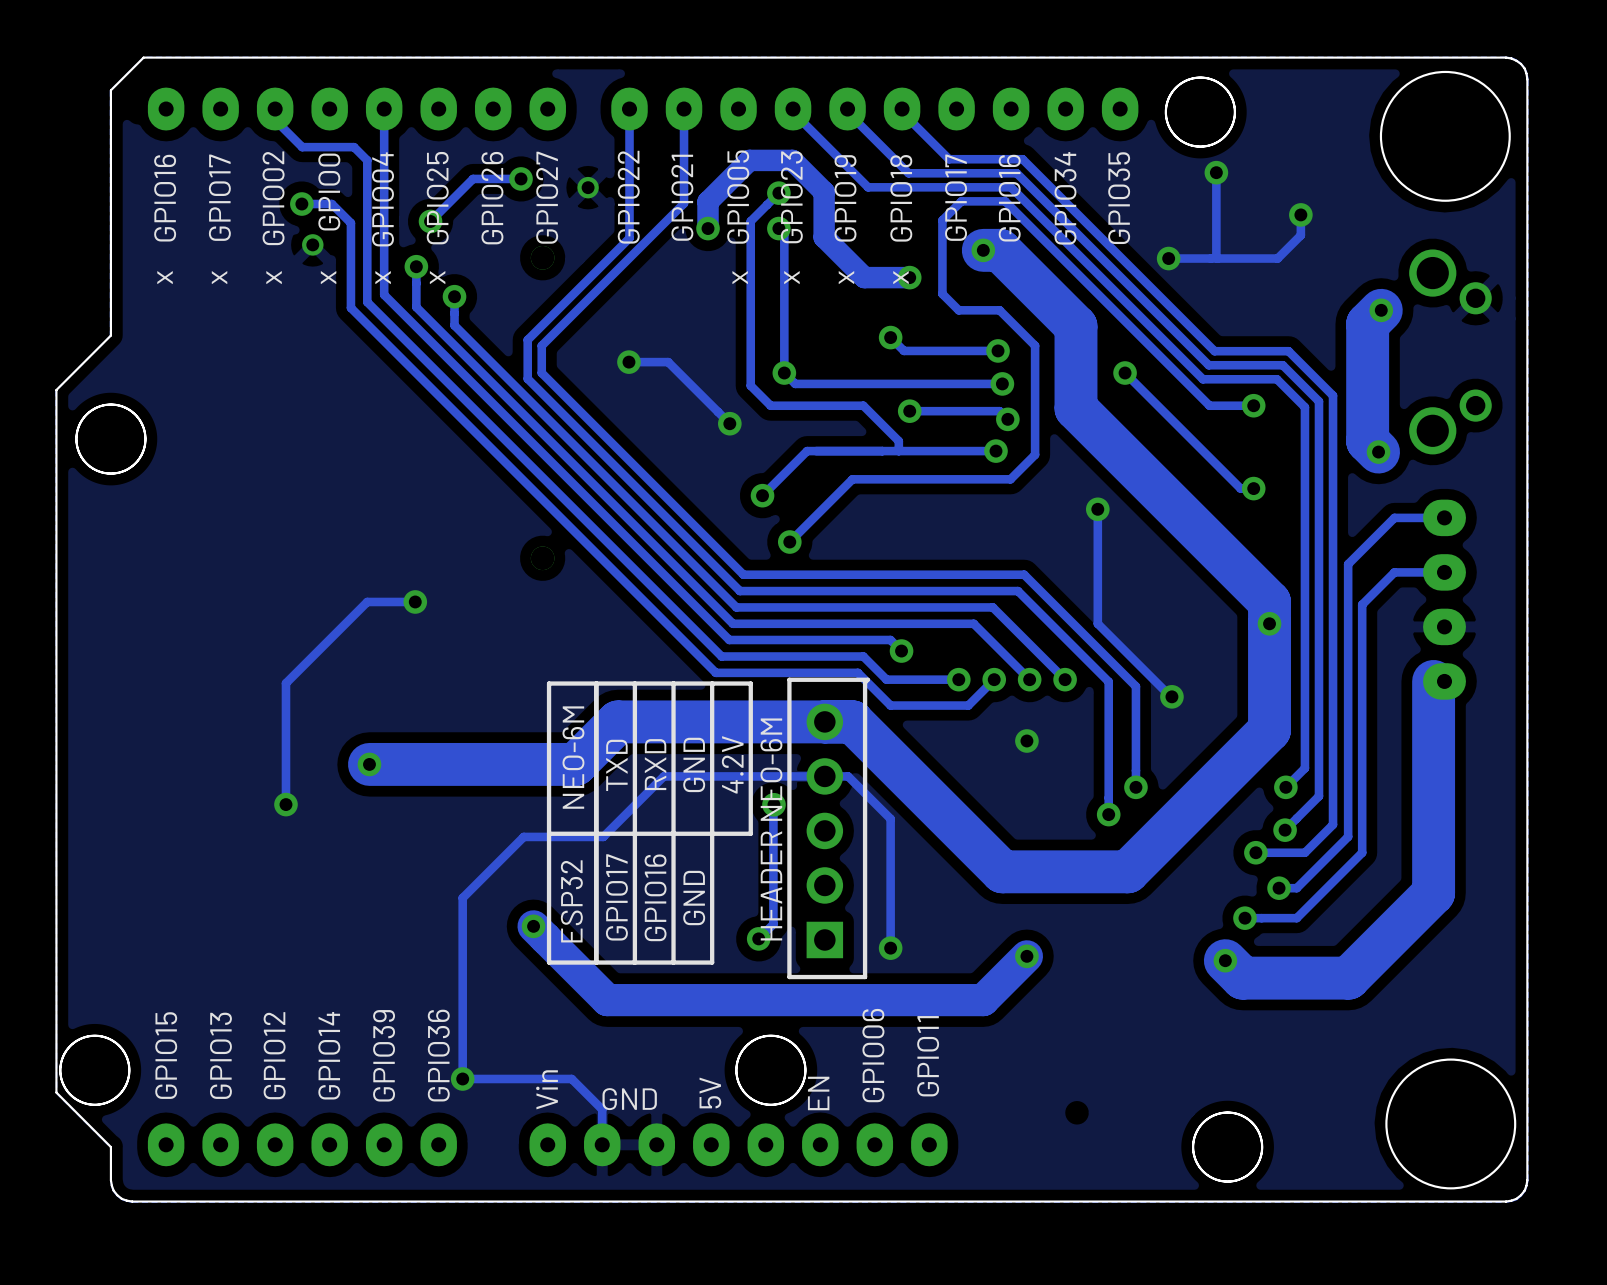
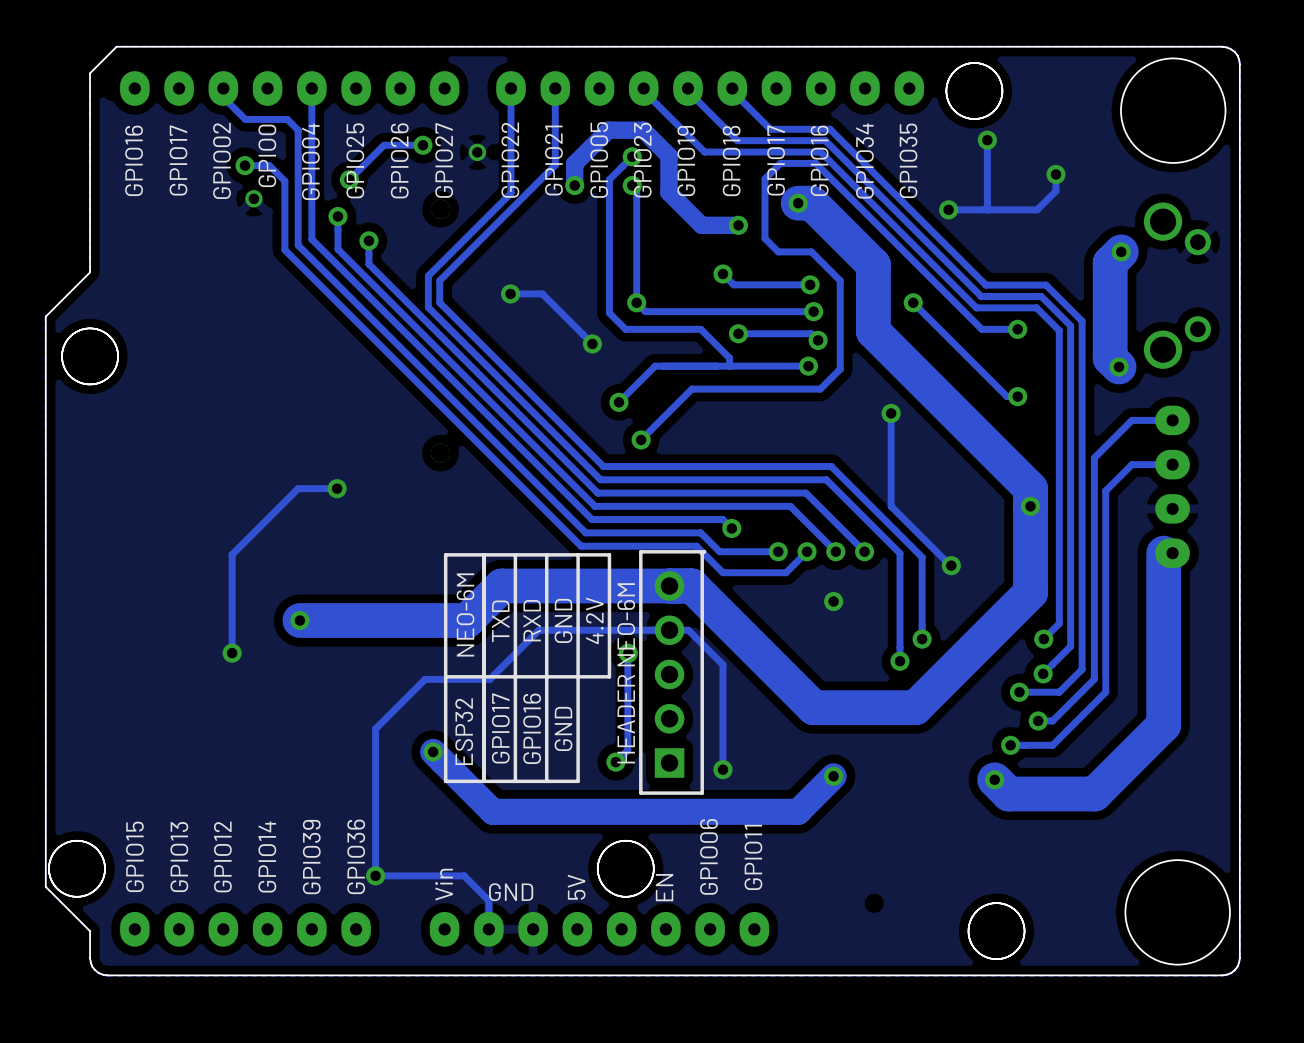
text: x (165, 277) -> none
text: x (219, 277) -> none
text: x (274, 277) -> none
text: x (328, 277) -> none
text: x (383, 277) -> none
text: x (437, 277) -> none
text: x (740, 277) -> none
text: x (791, 277) -> none
text: x (846, 277) -> none
text: x (900, 277) -> none

